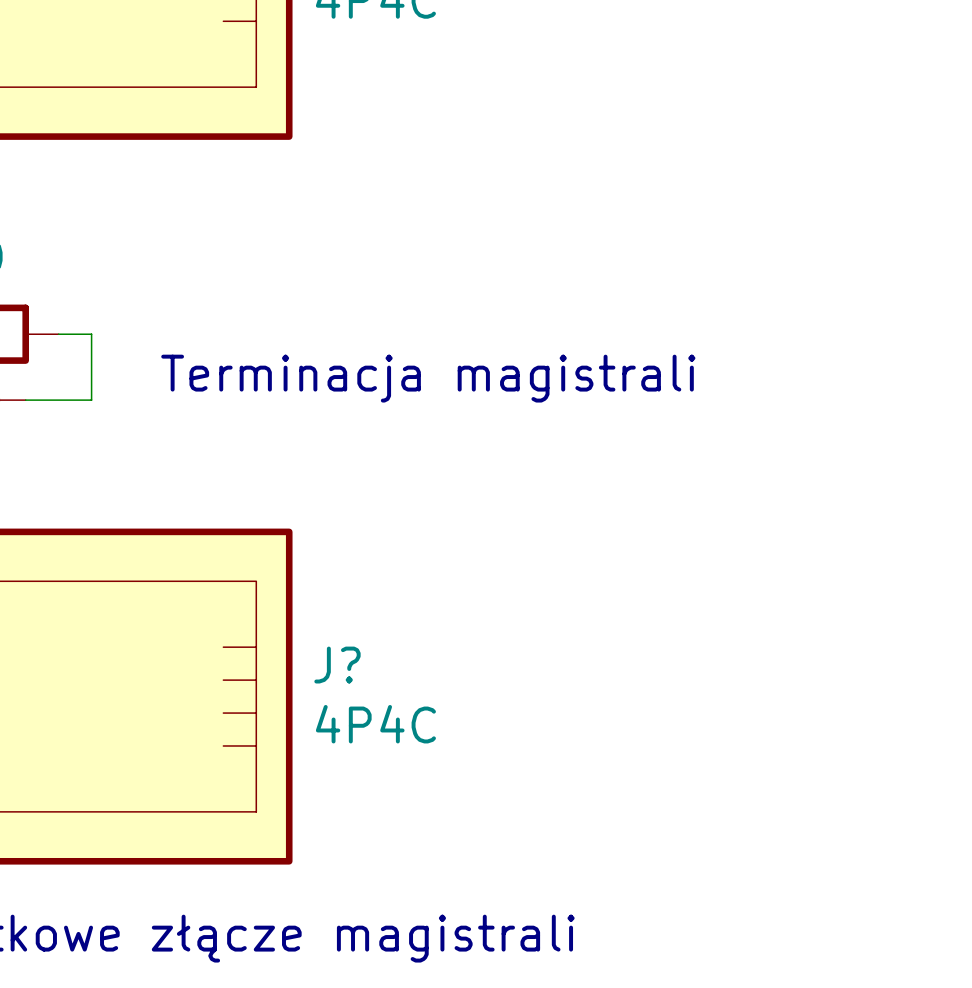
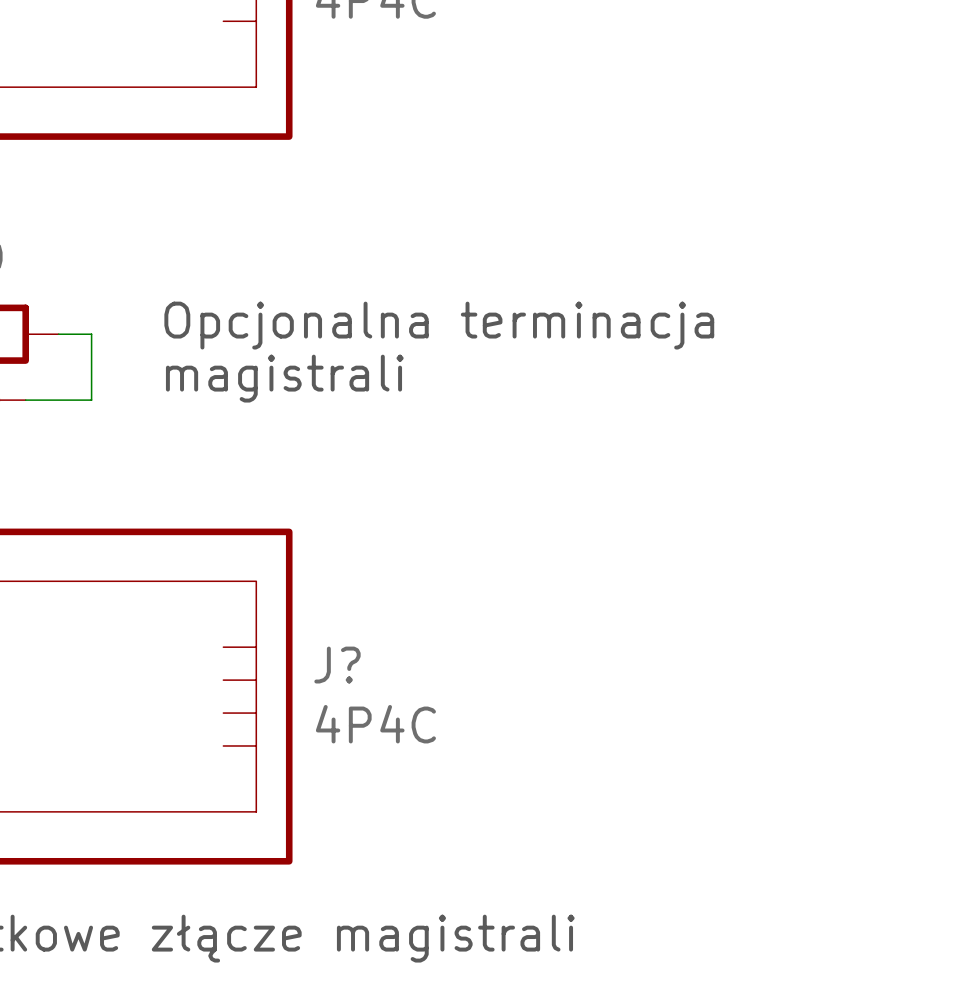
text: none -> Opcjonalna terminacja (439, 325)
text: Terminacja magistrali (428, 378) -> magistrali (284, 378)

